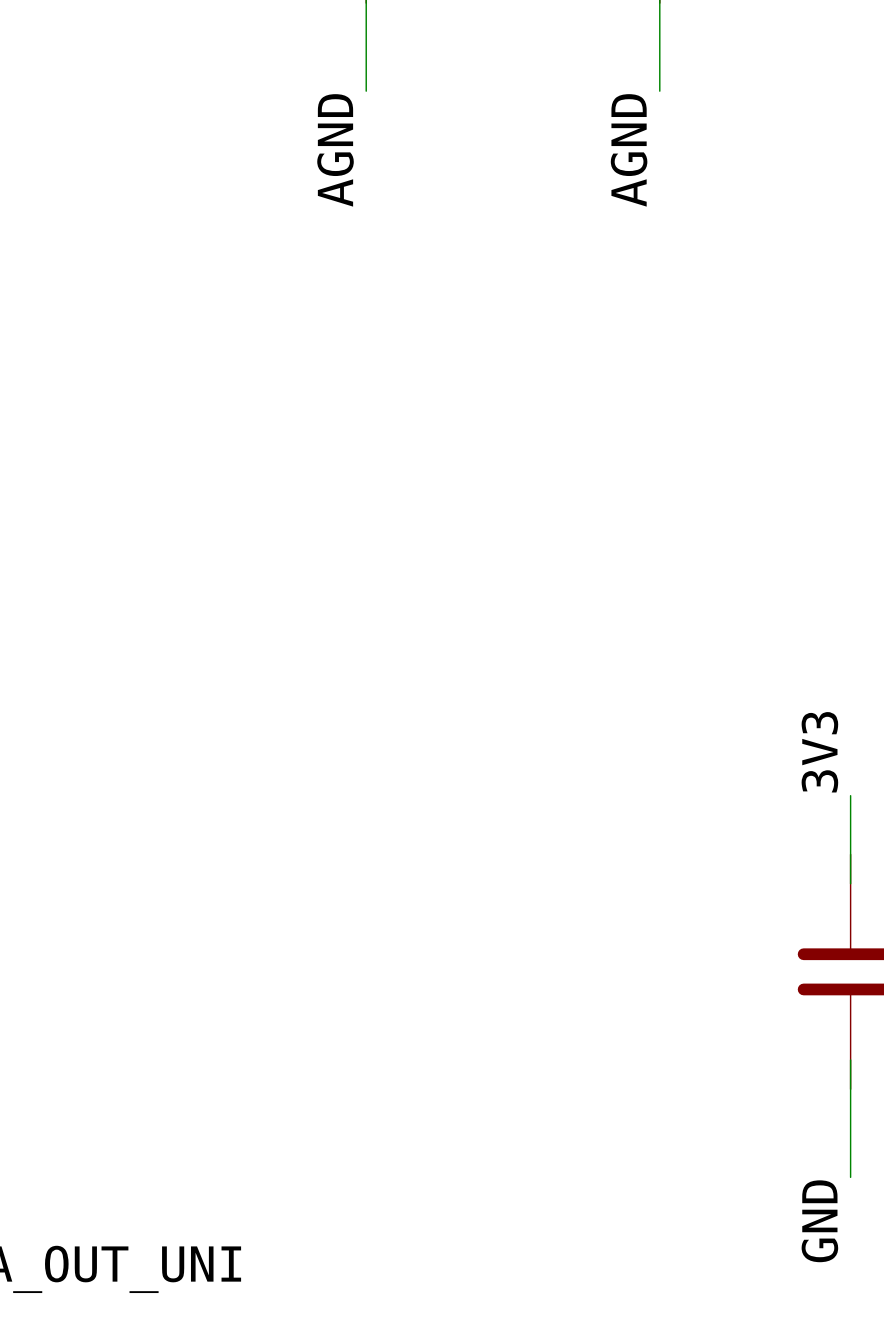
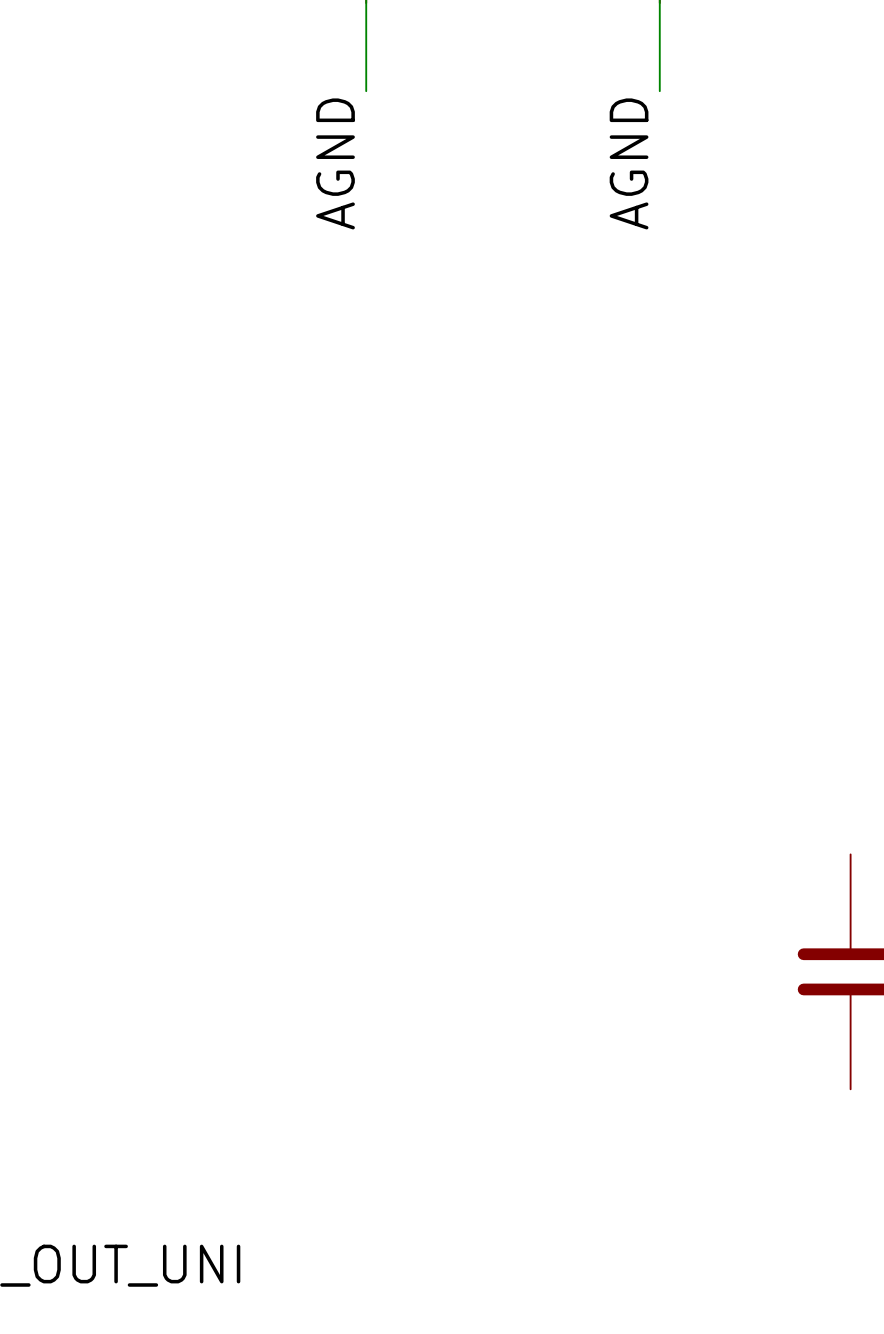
label: 3V3 (819, 752) -> none
wire: (850, 795) (850, 883) -> none
wire: (850, 1059) (850, 1177) -> none
label: GND (819, 1221) -> none

